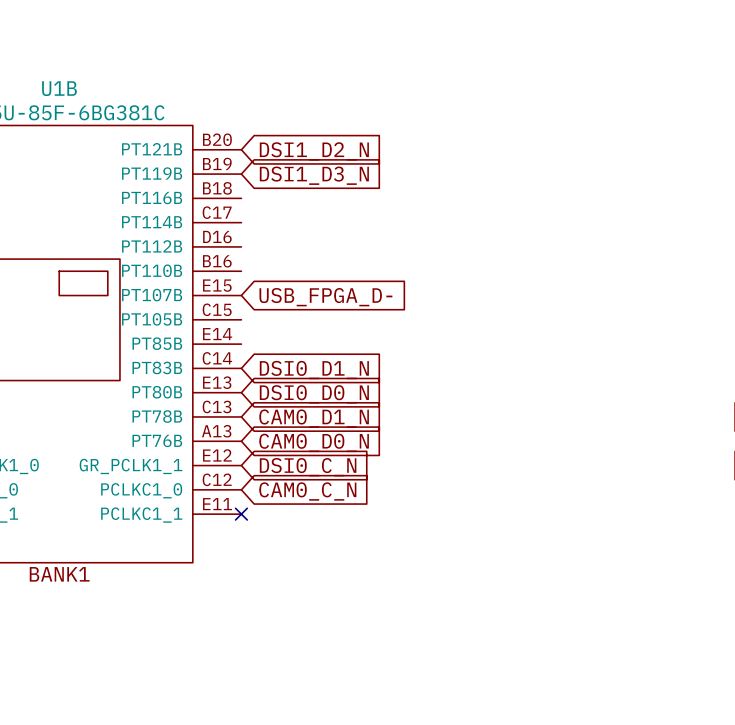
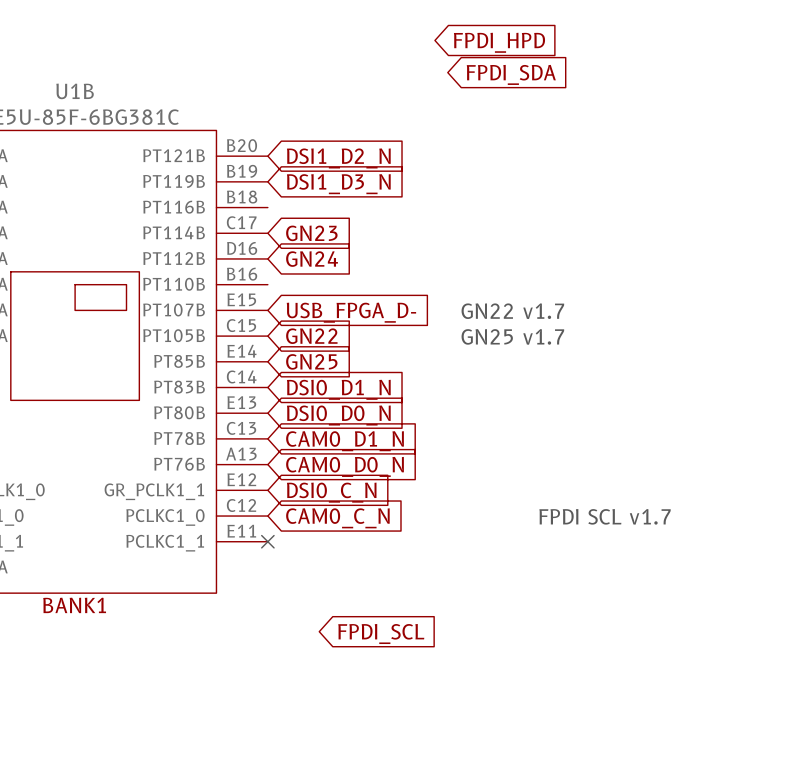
global label: none -> FPDI_HPD (499, 42)
global label: none -> FPDI_SDA (511, 74)
global label: none -> GN23 (311, 233)
global label: none -> GN24 (312, 259)
text: none -> GN22 v1.7 (512, 311)
global label: none -> GN22 (311, 336)
text: none -> GN25 v1.7 (512, 336)
global label: none -> GN25 (311, 361)
text: none -> FPDI SCL v1.7 (605, 516)
global label: none -> FPDI_SCL (381, 634)

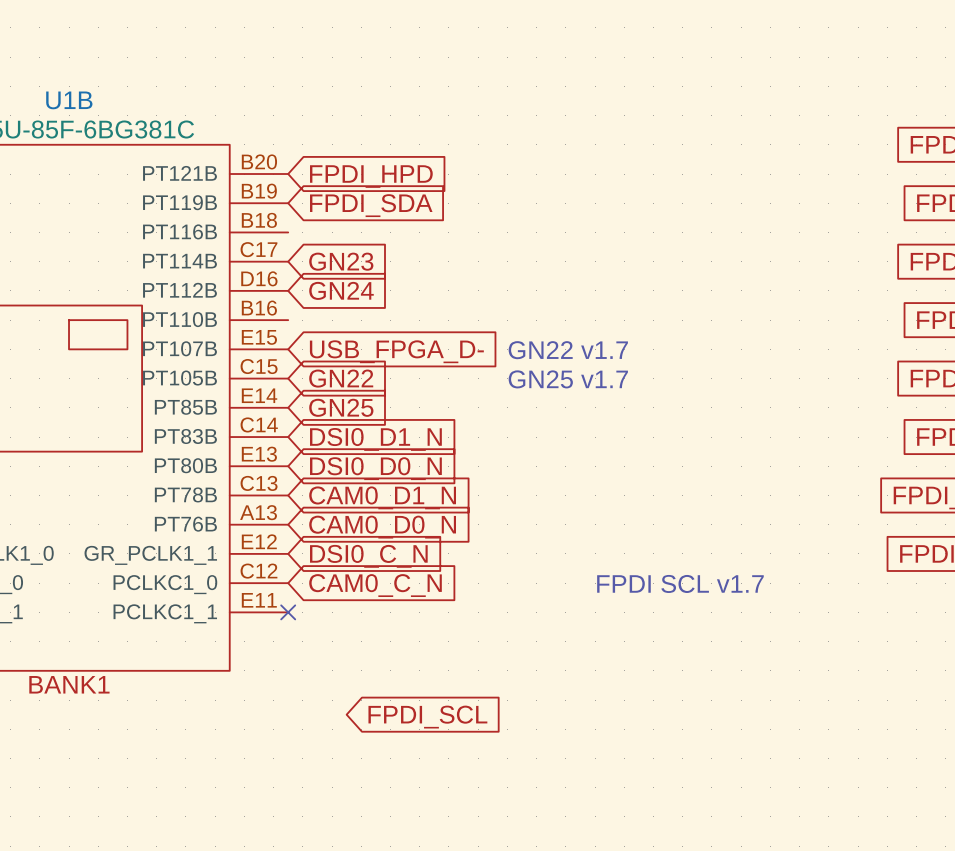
global label: FPDI_HPD (499, 42) -> none
global label: FPDI_SDA (511, 74) -> none
global label: DSI1_D2_N (338, 158) -> FPDI_HPD (371, 176)
global label: DSI1_D3_N (338, 184) -> FPDI_SDA (371, 205)

